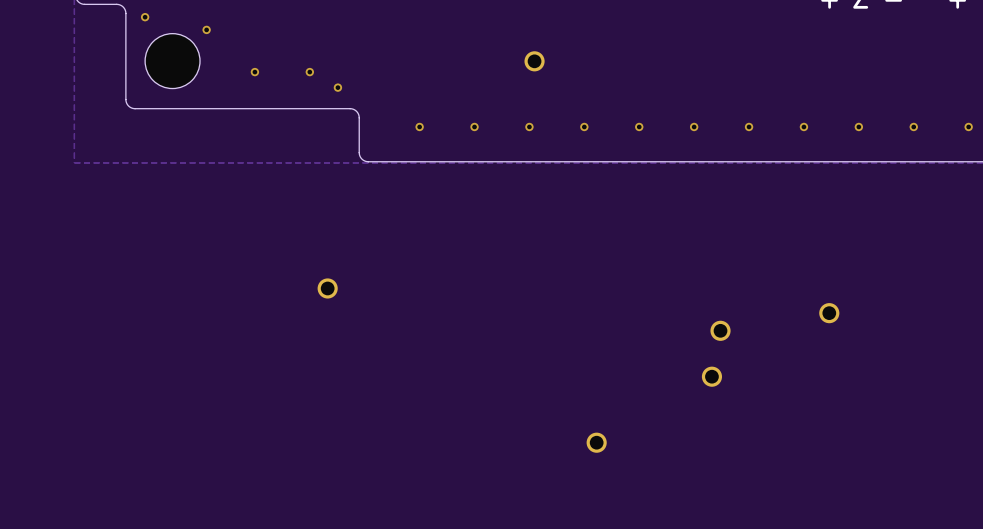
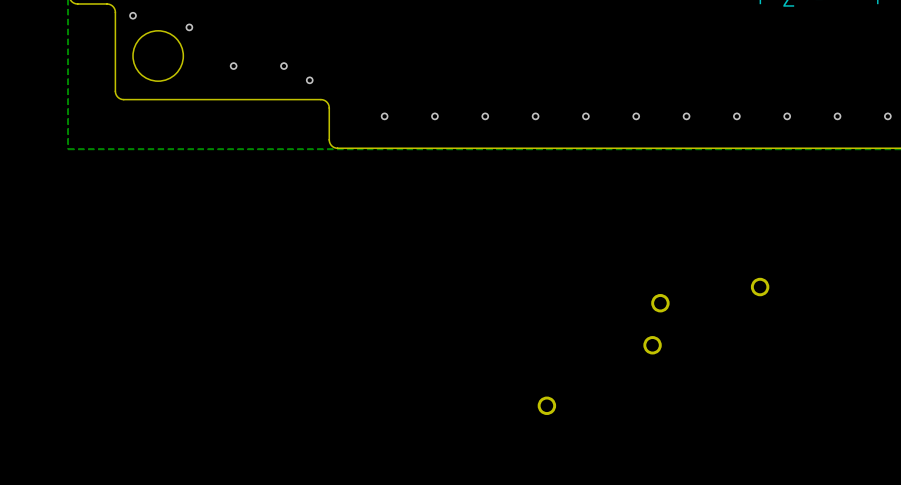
part: (534, 61) -> none
part: (327, 288) -> none

